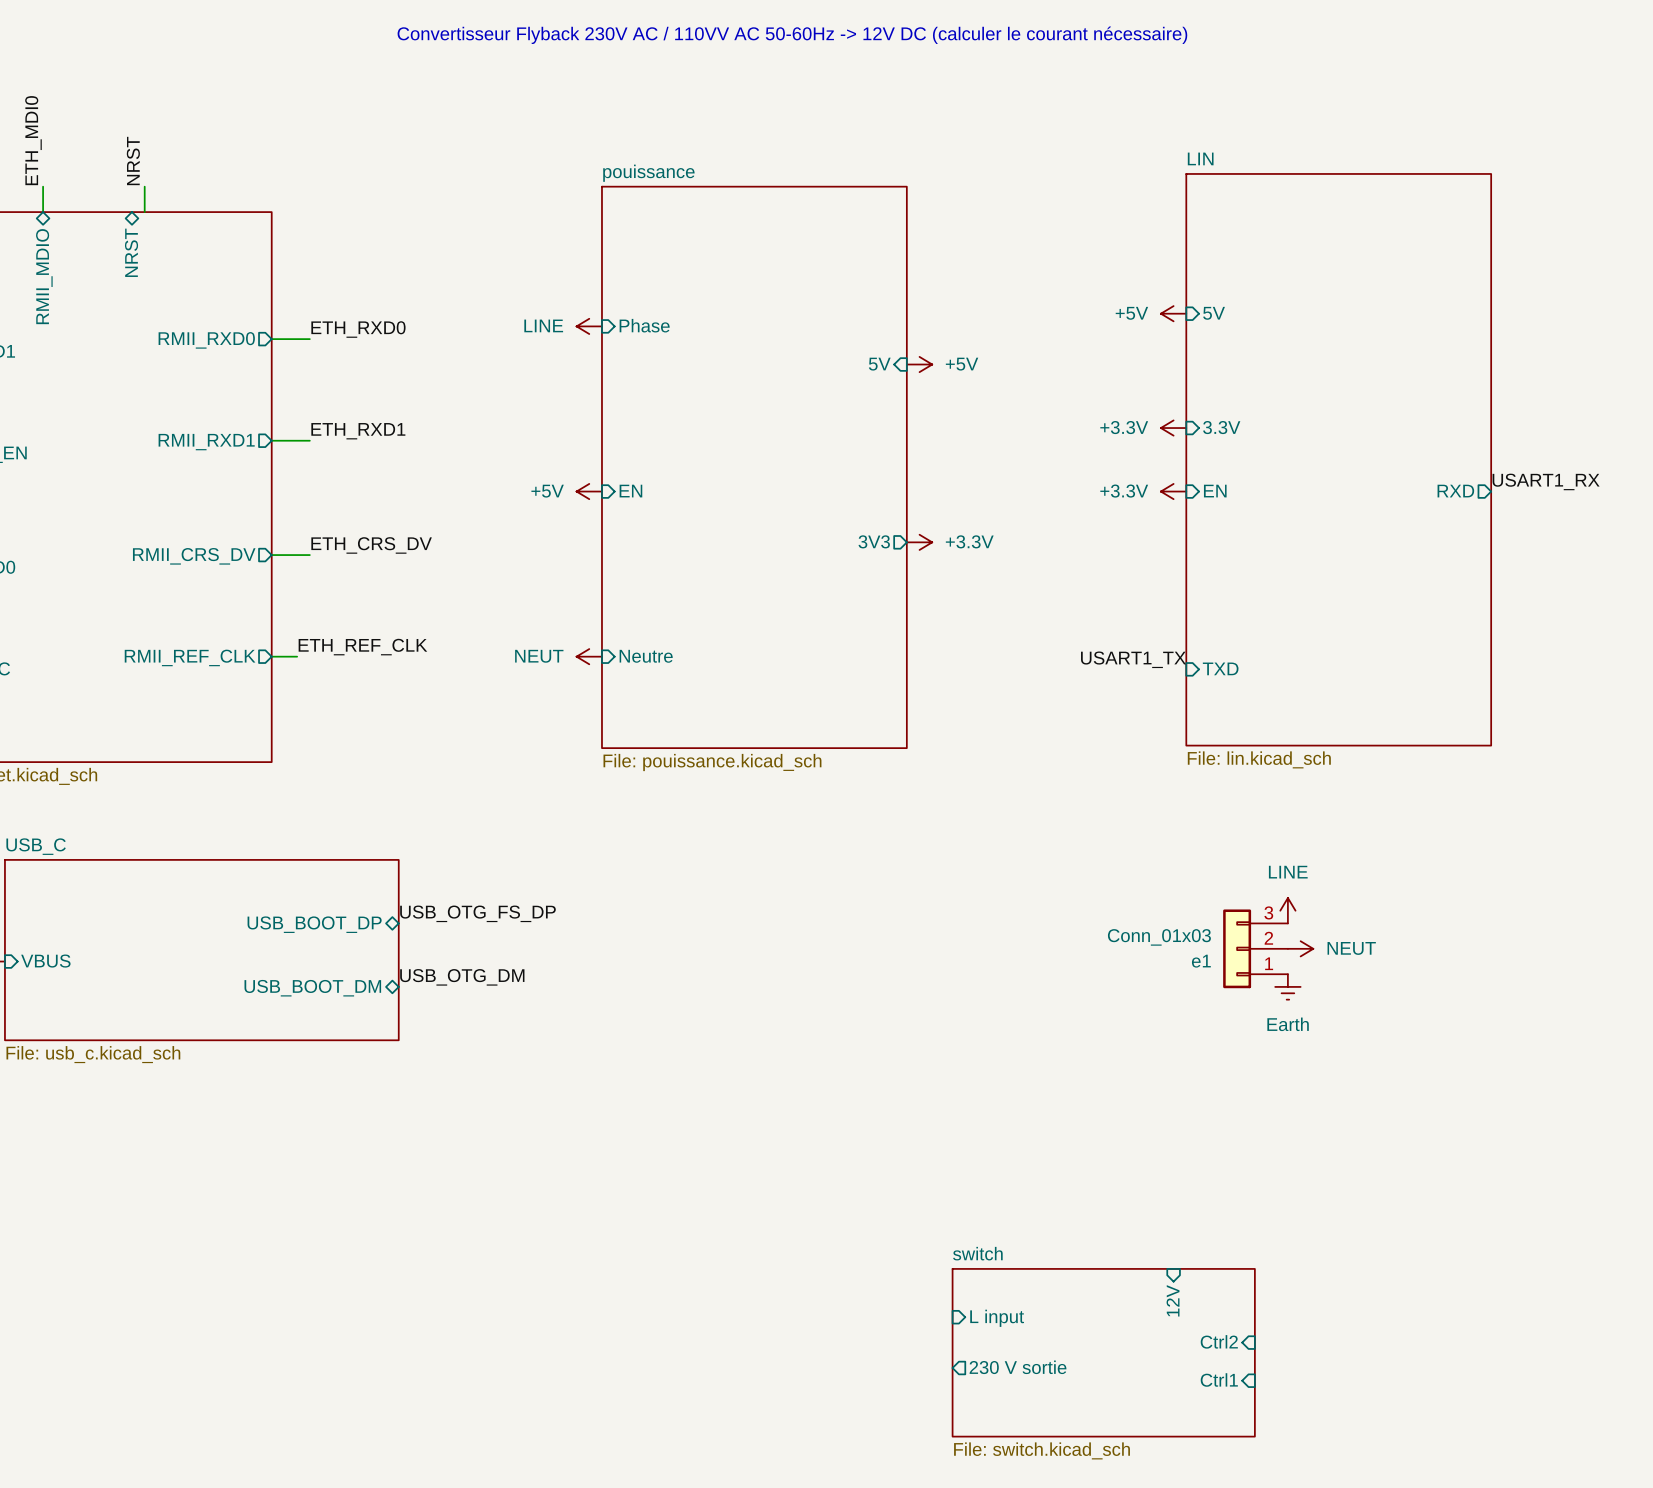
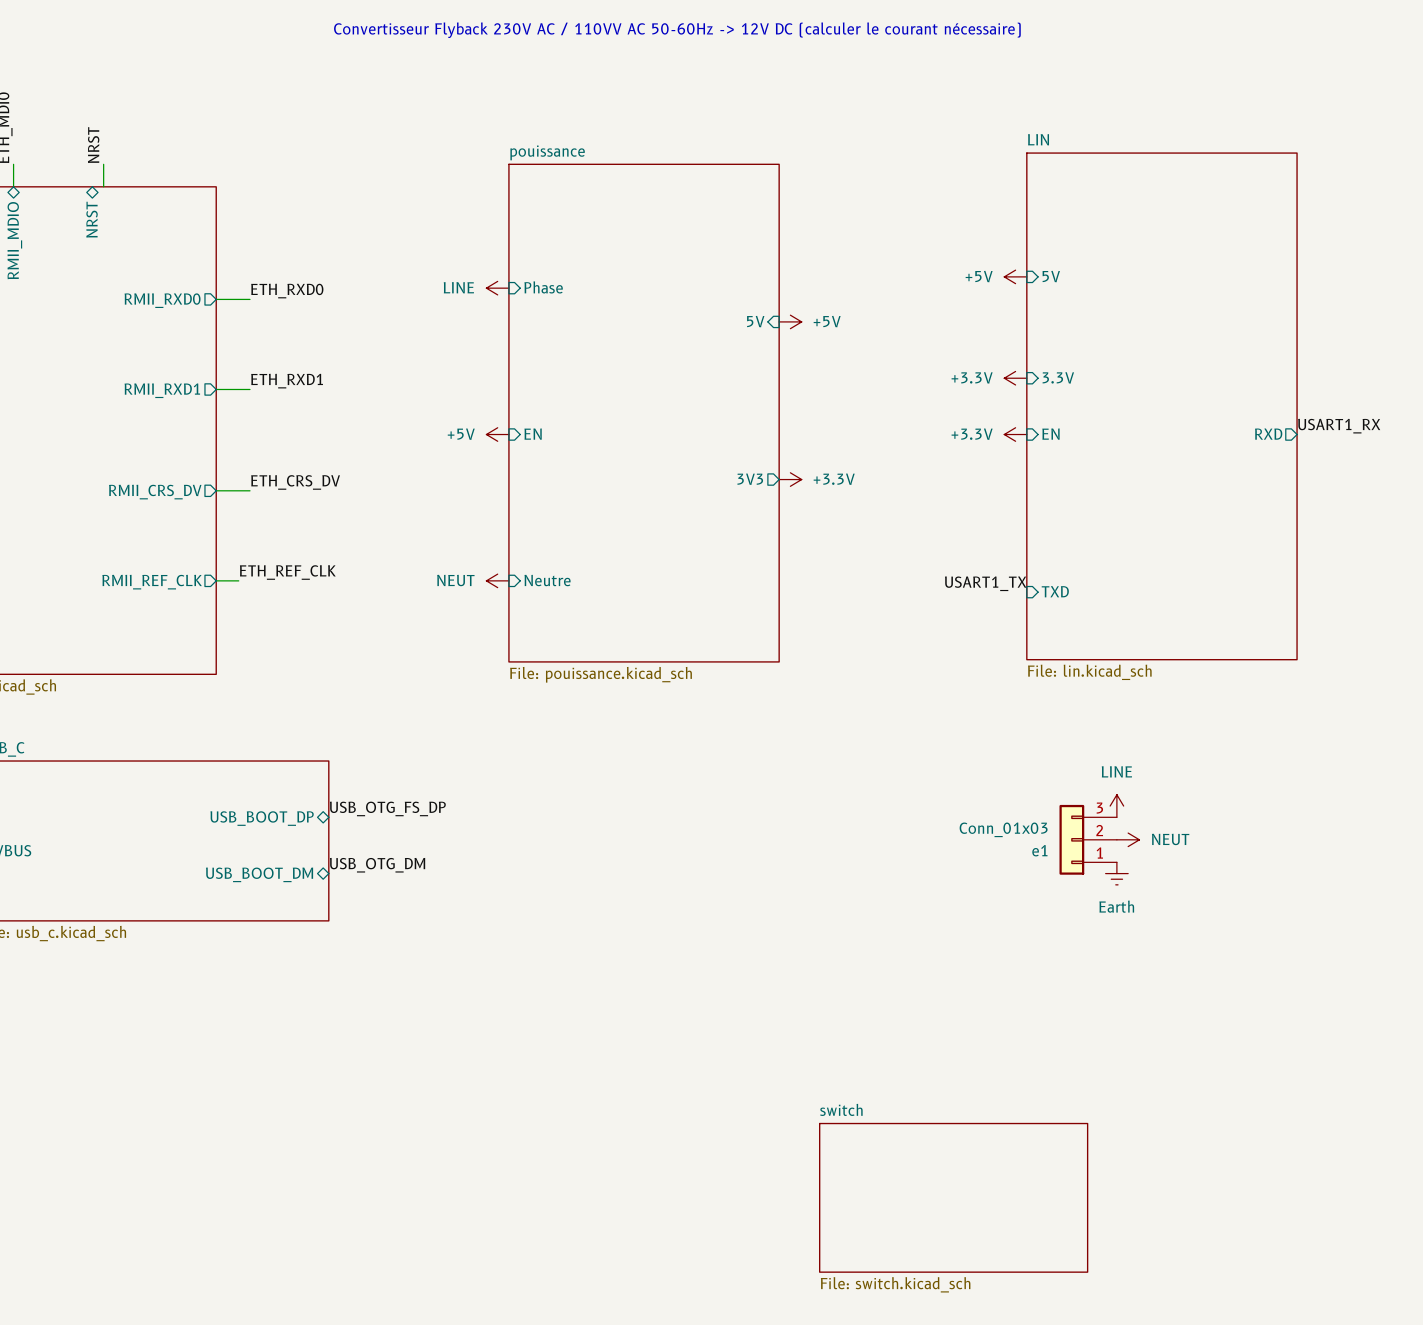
sheet pin: 12V (1173, 1300) -> none
sheet pin: L input (997, 1318) -> none
sheet pin: Ctrl2 (1219, 1341) -> none
sheet pin: 230 V sortie (1018, 1367) -> none
sheet pin: Ctrl1 (1219, 1379) -> none

